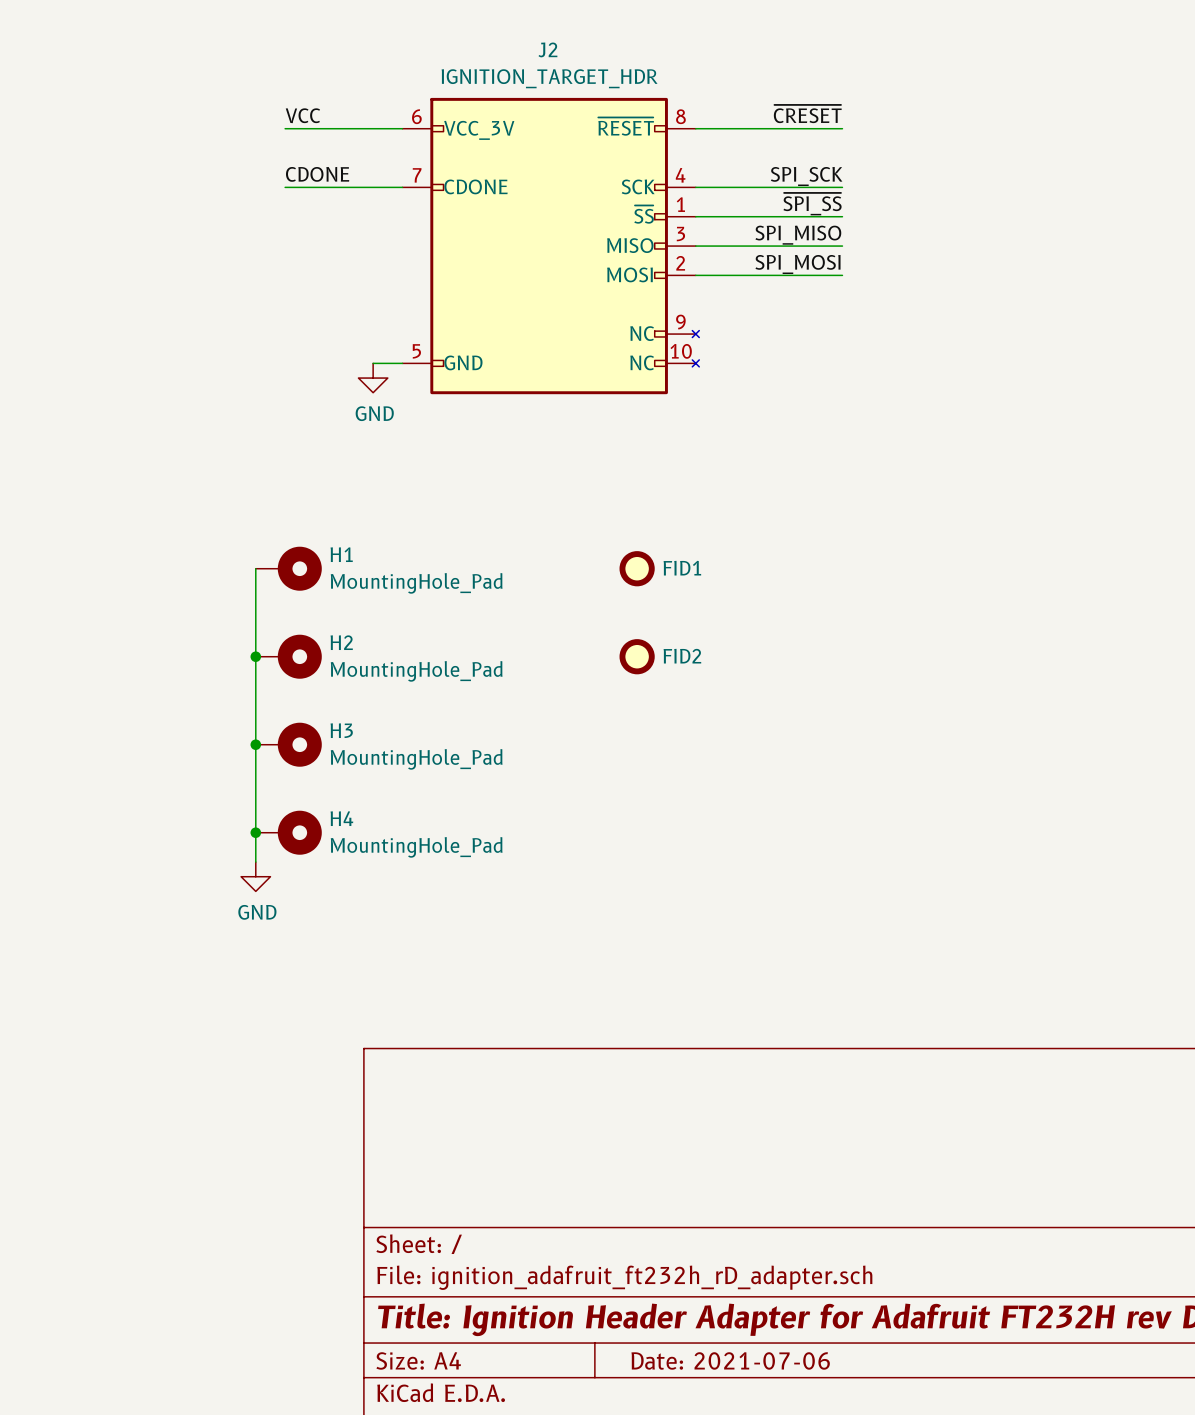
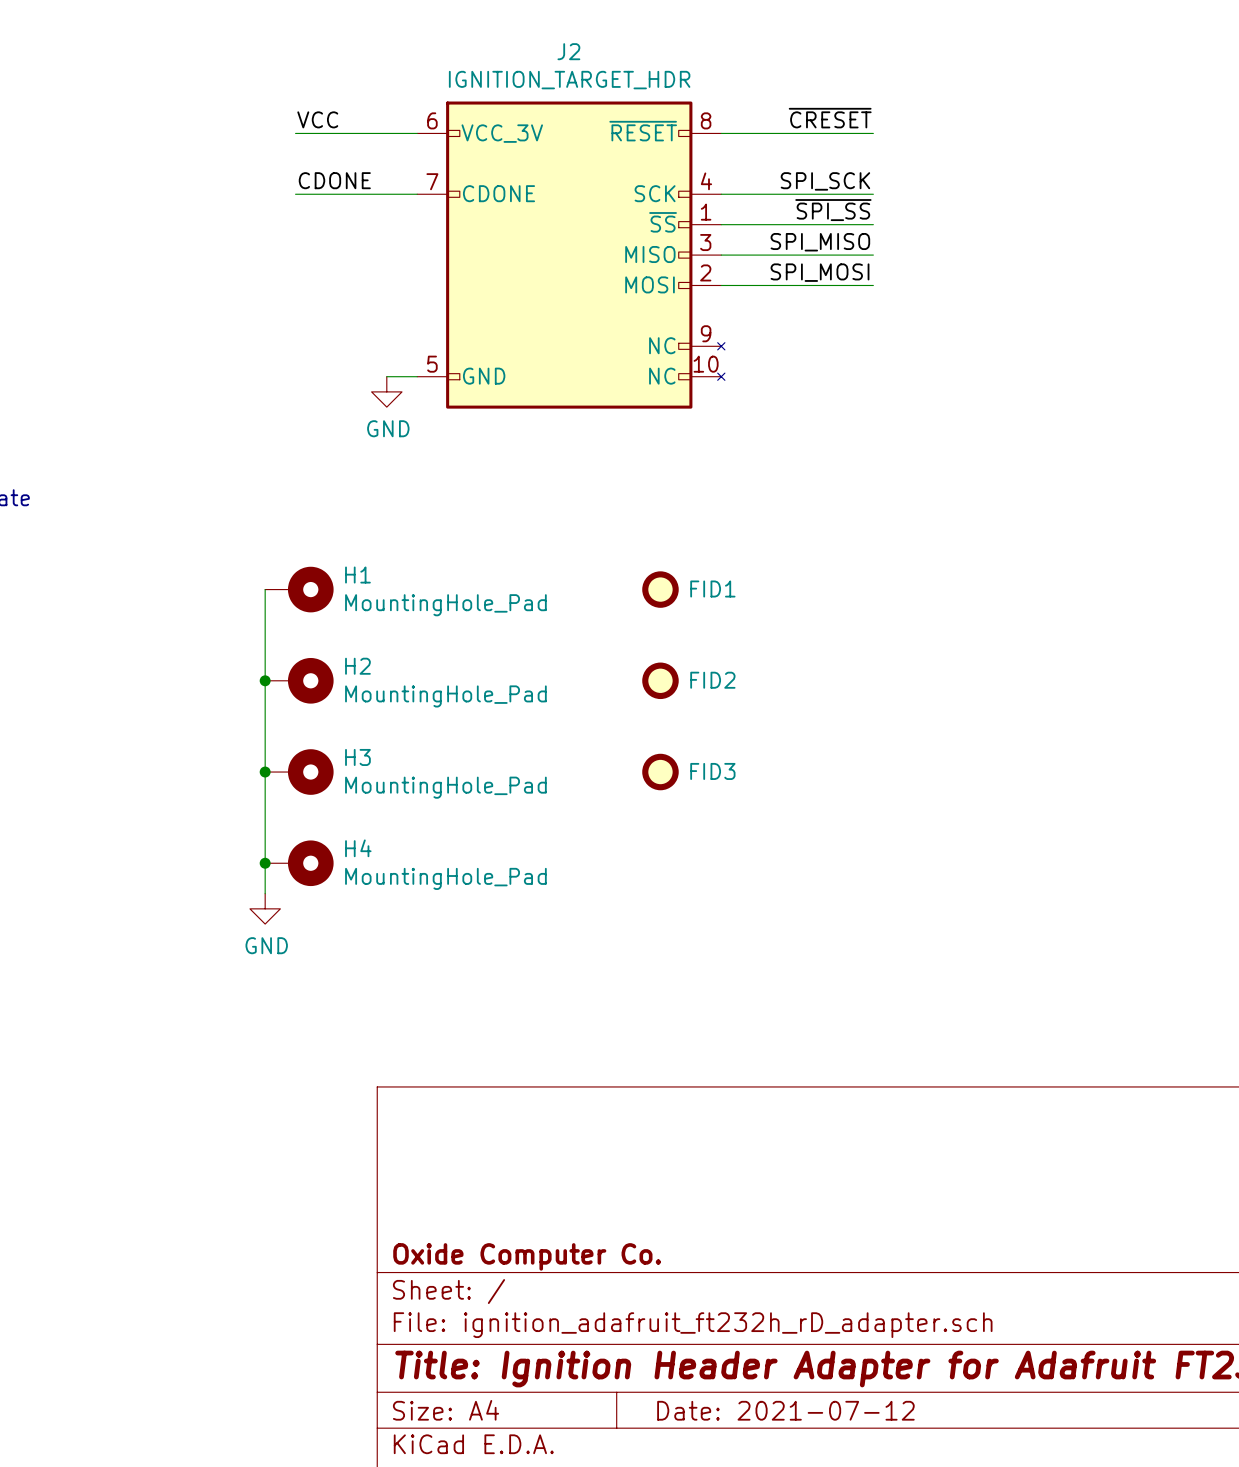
FID3: none -> (660, 772)
title block: none -> Oxide Computer Co. (527, 1256)
title block: Date: 2021-07-06 (730, 1360) -> Date: 2021-07-12 (785, 1410)

